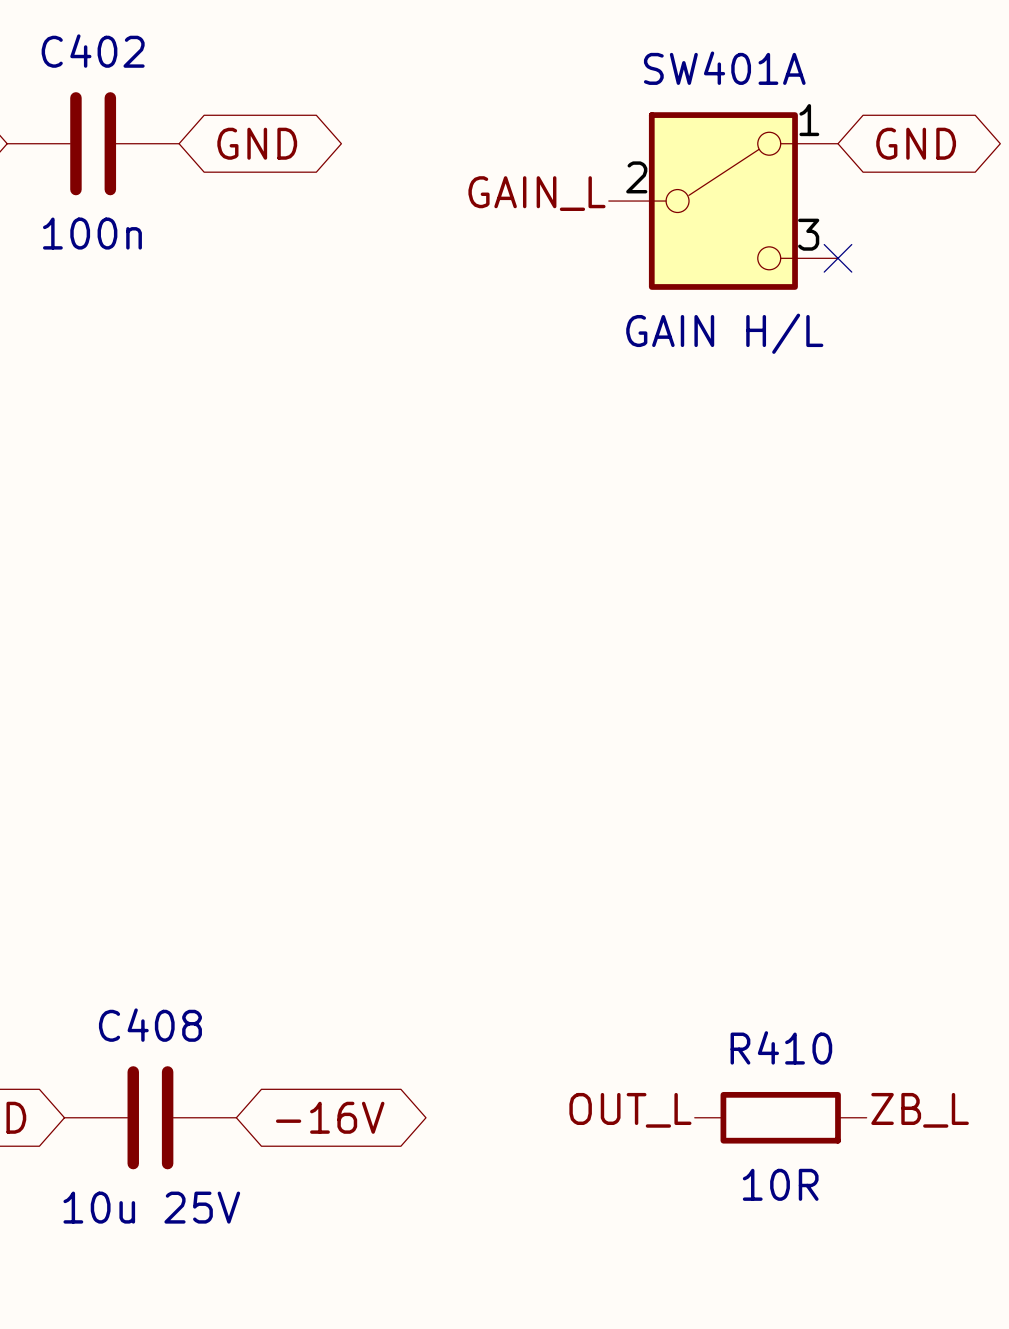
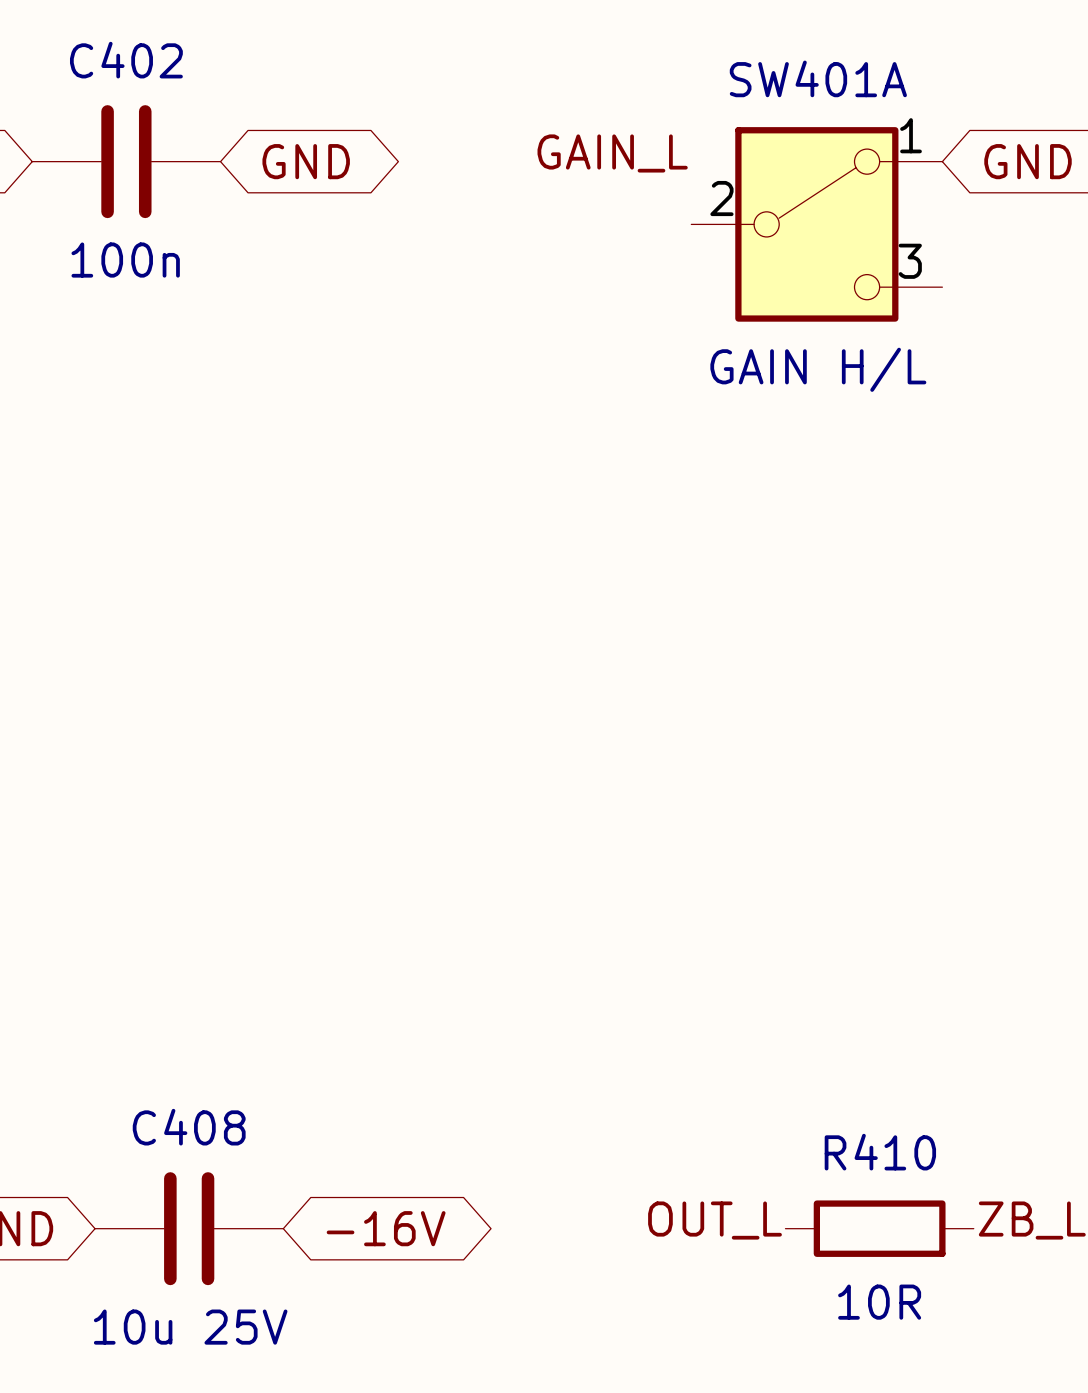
label position: GAIN_L (536, 193) -> GAIN_L (612, 153)
no-connect mark: (837, 258) -> none

